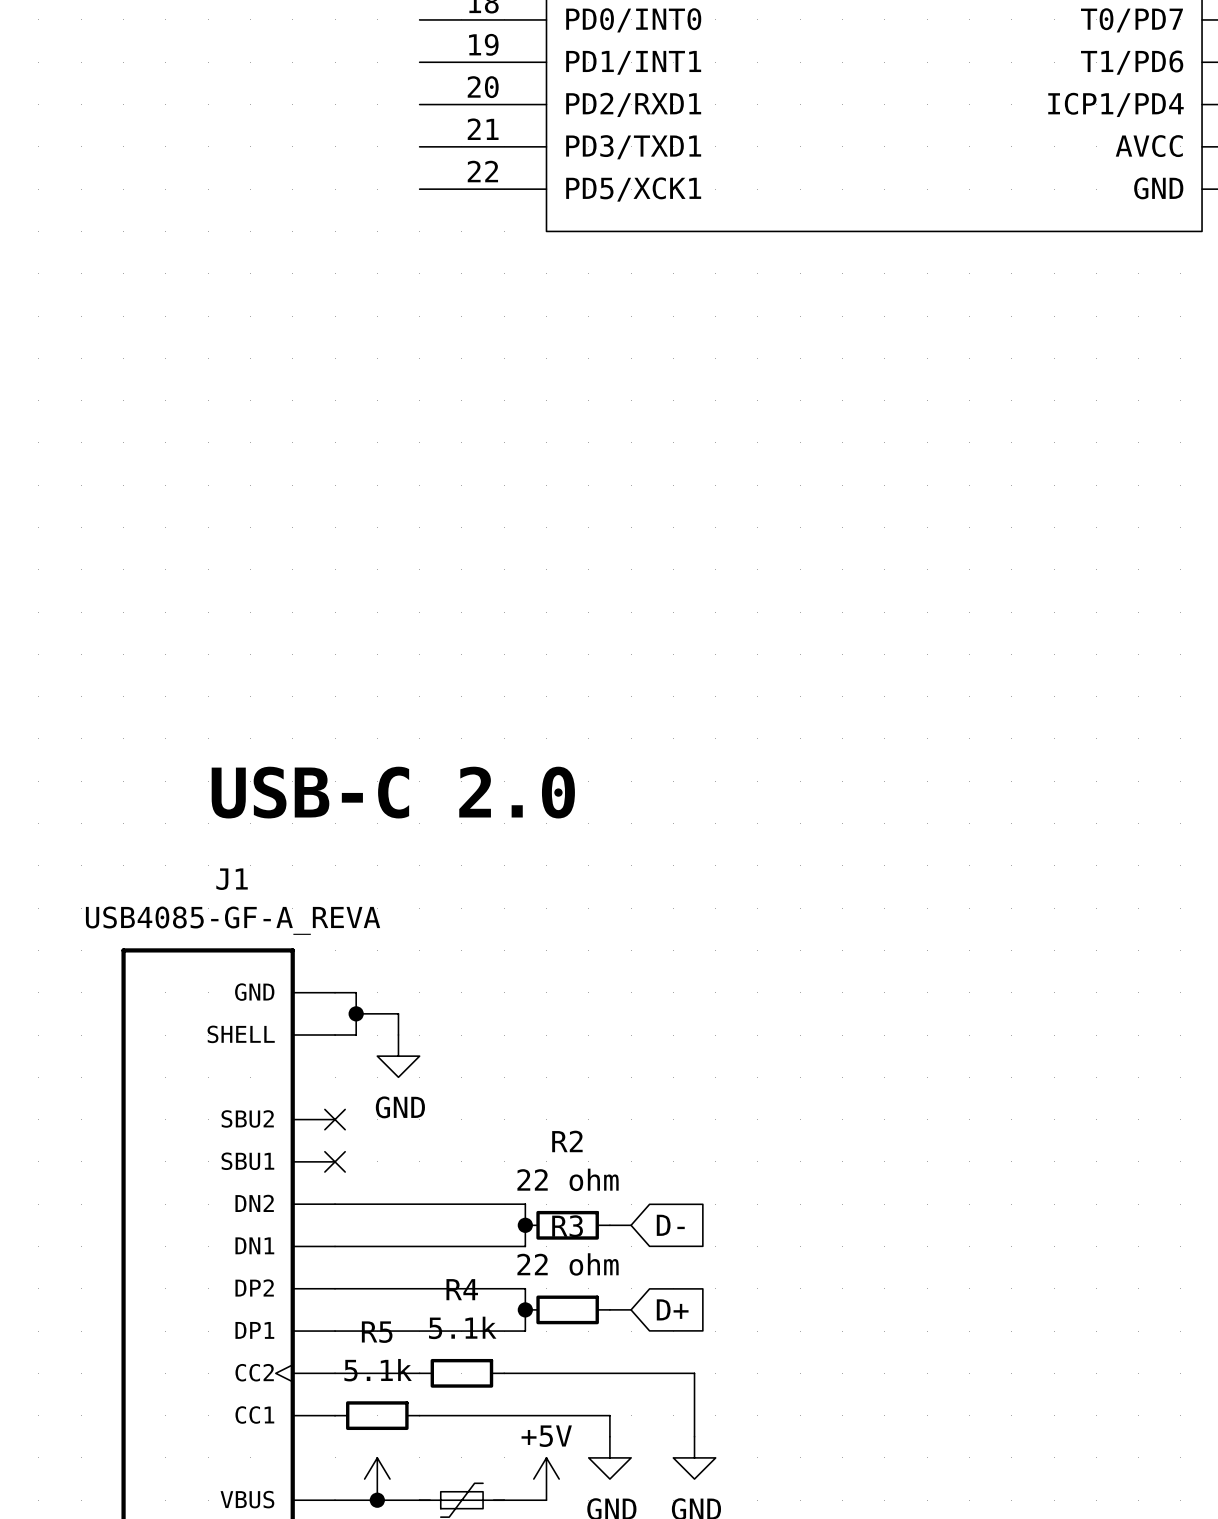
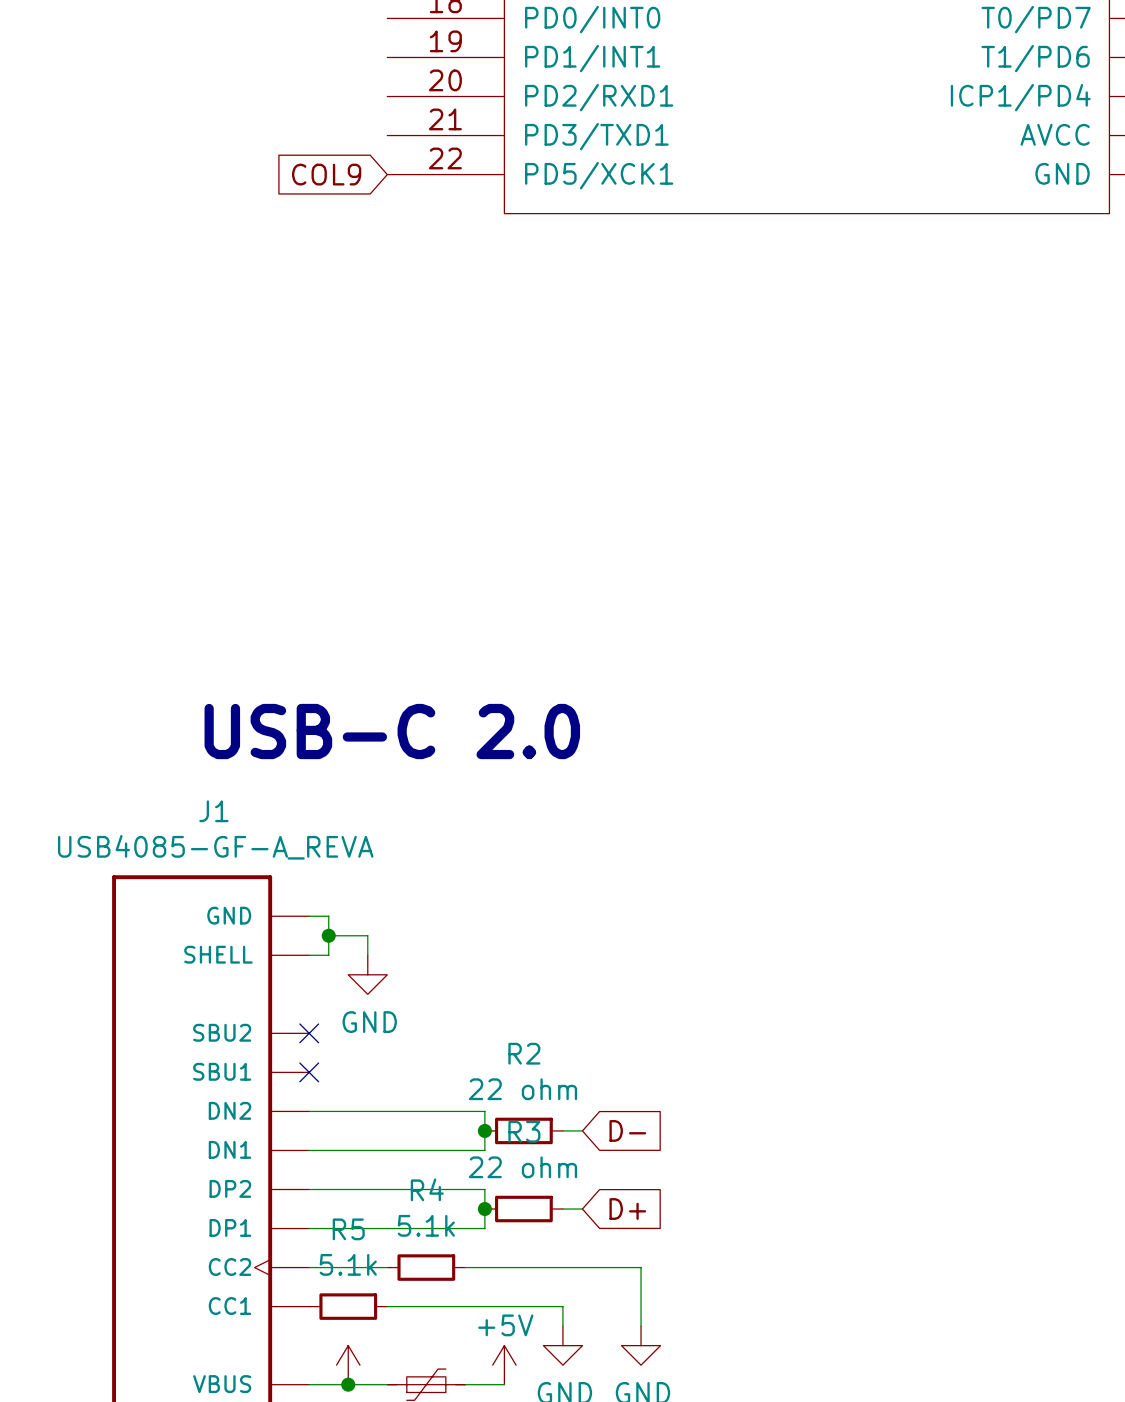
global label: none -> COL9 (326, 174)

